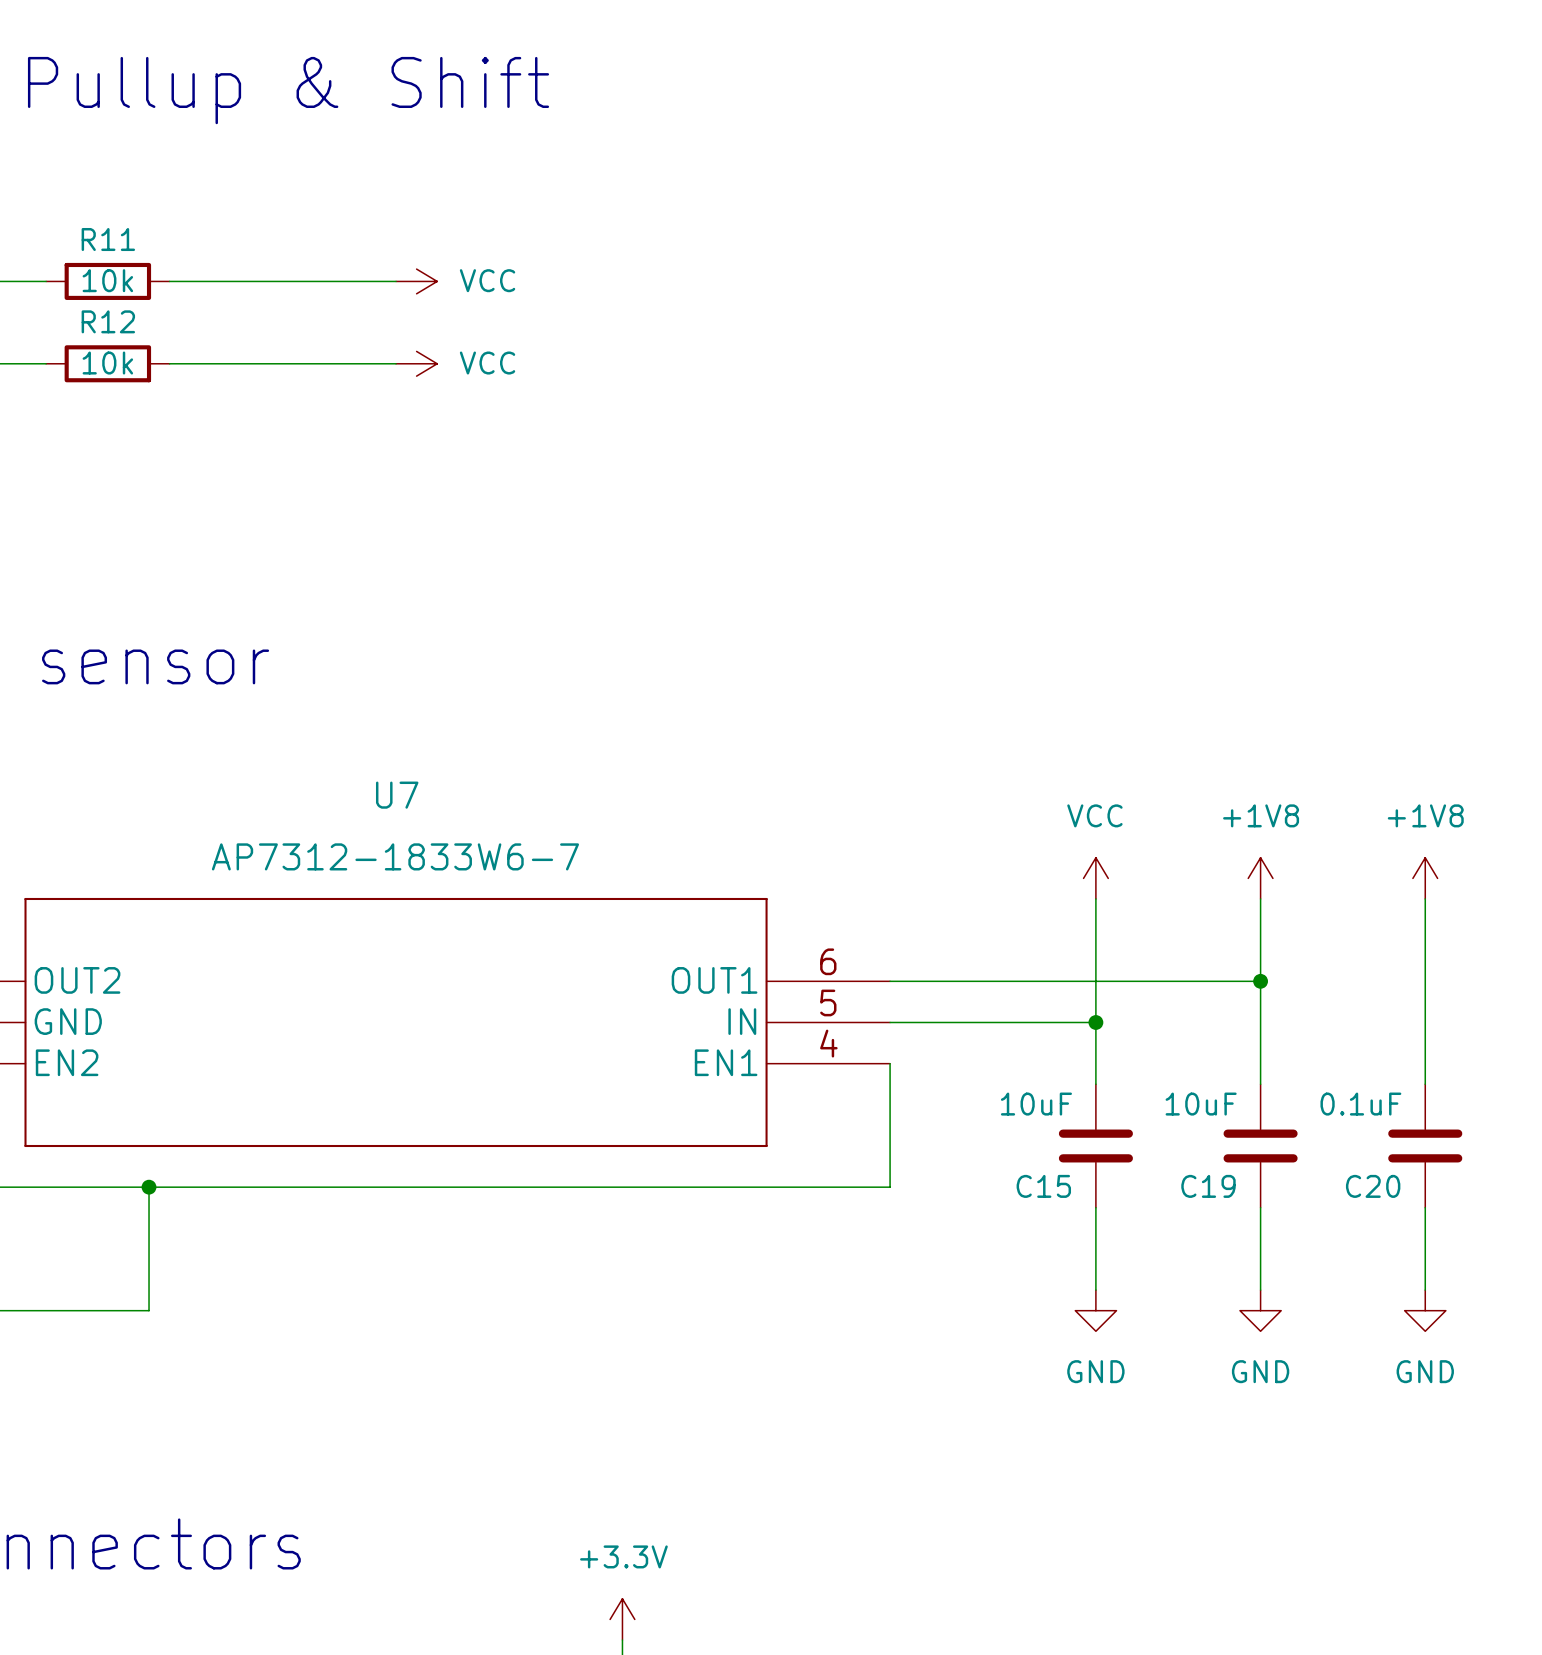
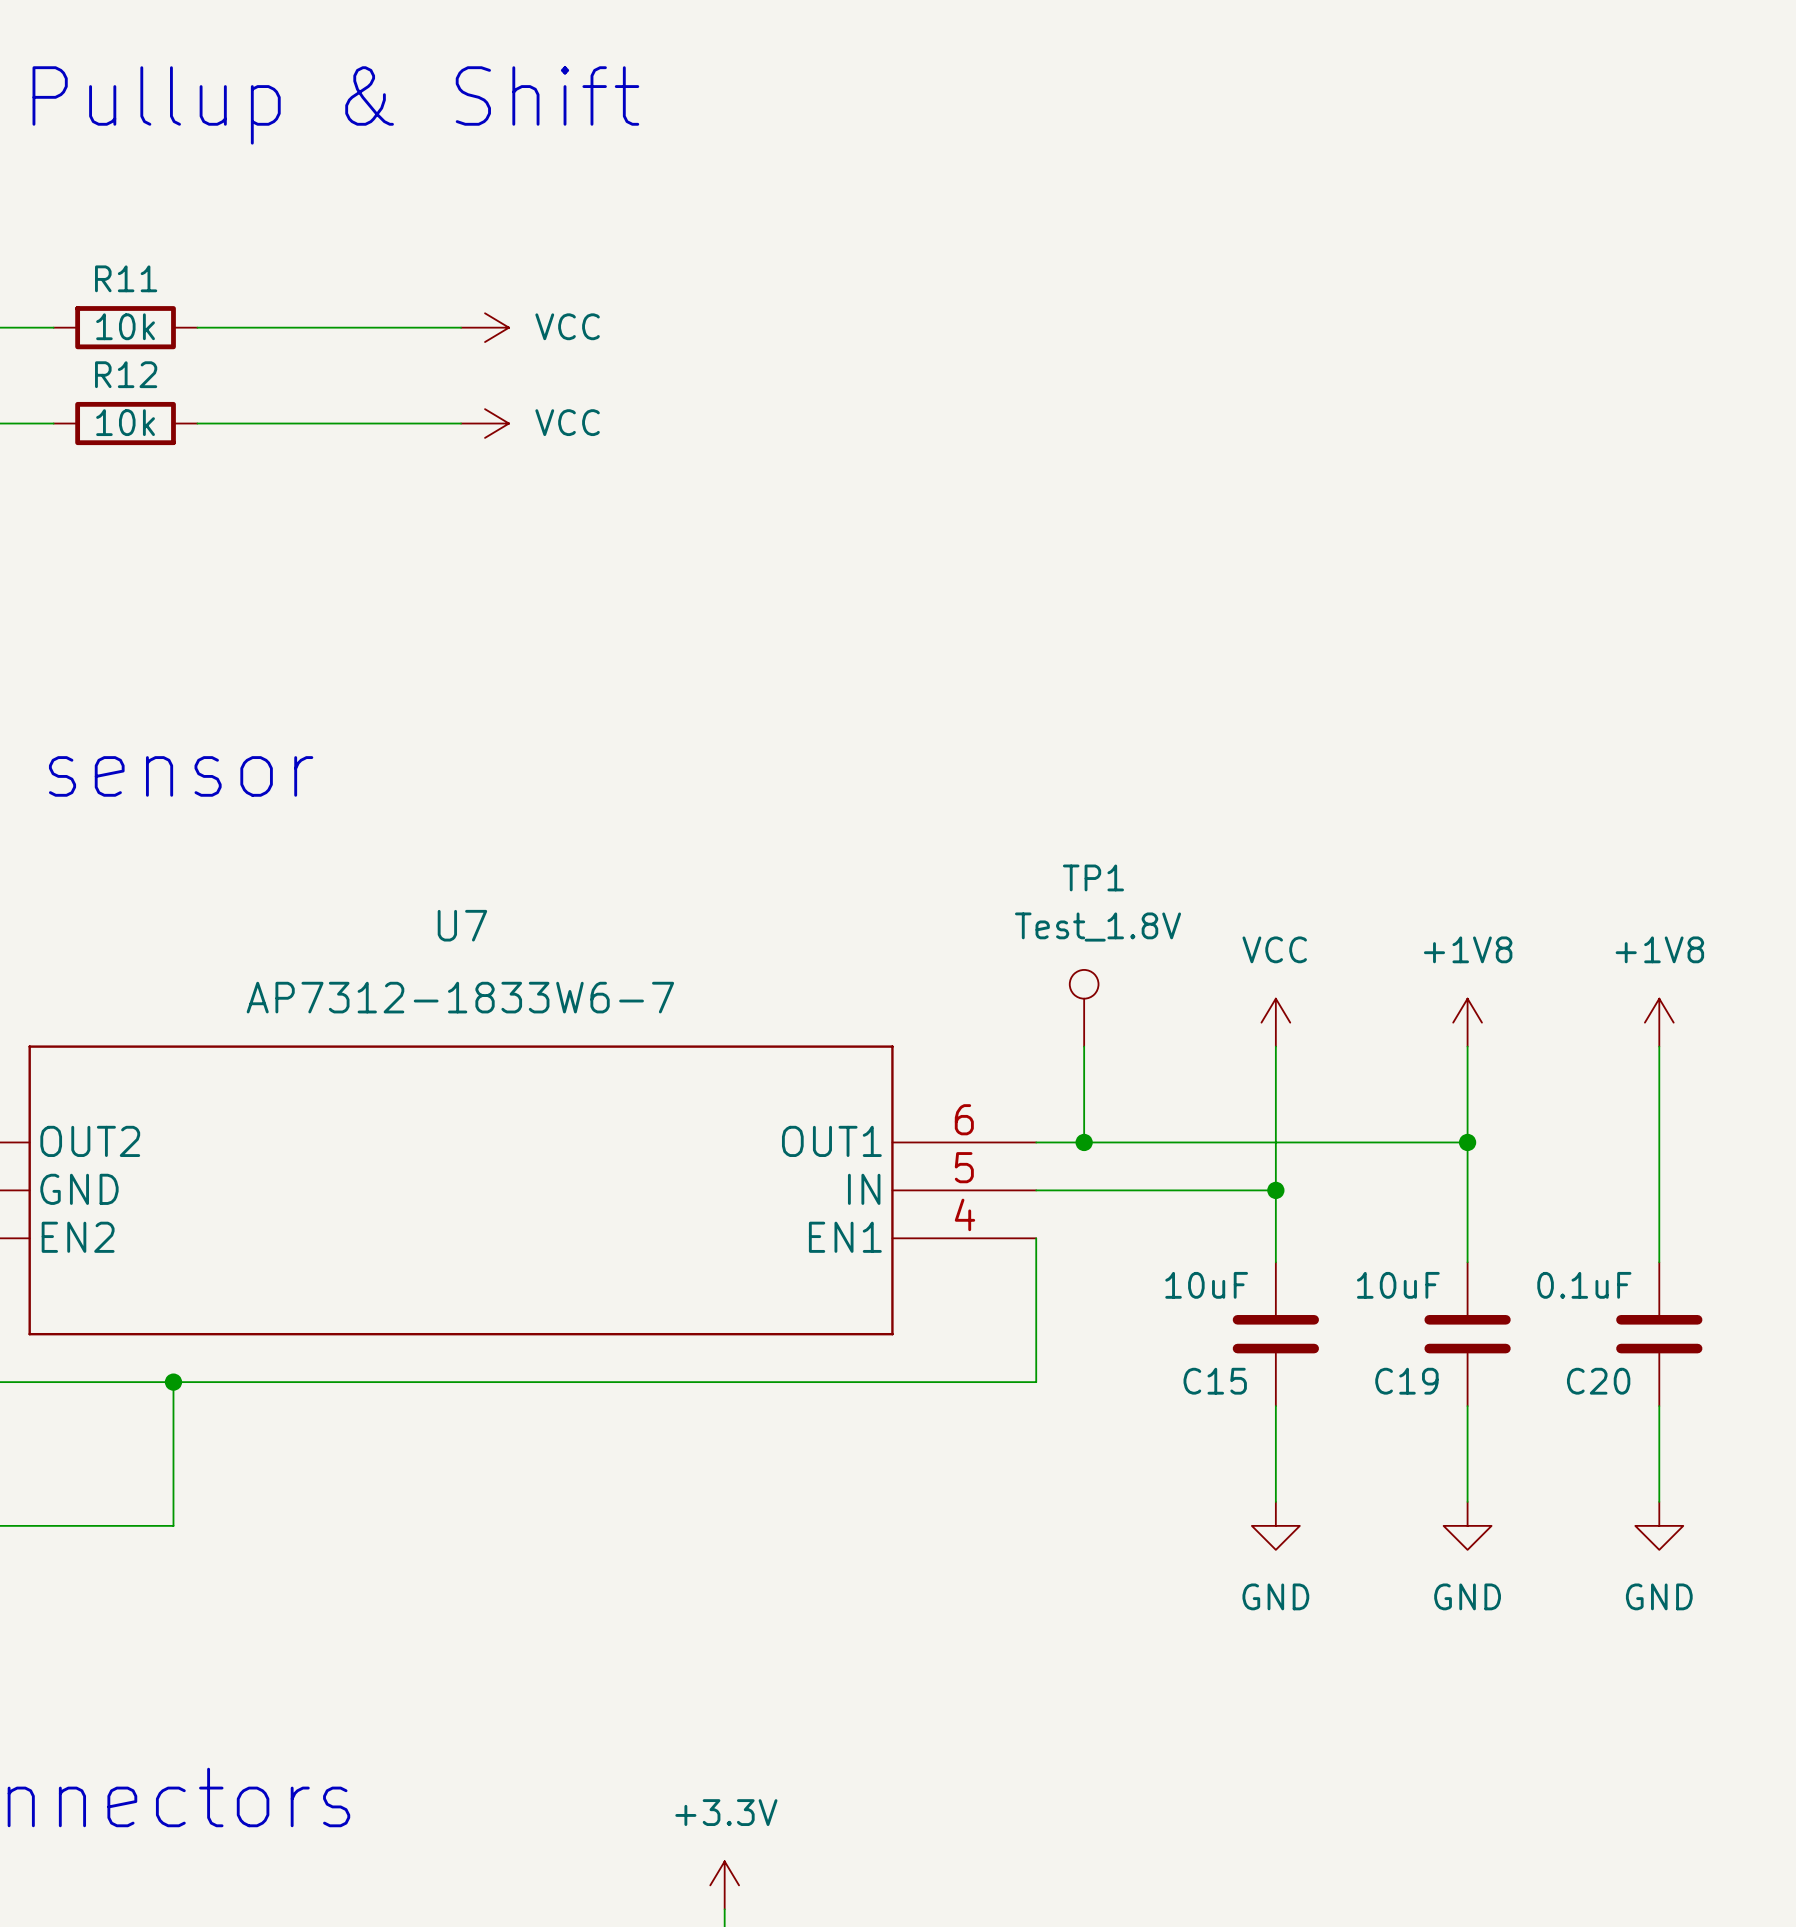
TP1: none -> Test_1.8V (1084, 1008)
wire: none -> (1084, 1046) (1084, 1142)
junction: none -> (1084, 1142)

